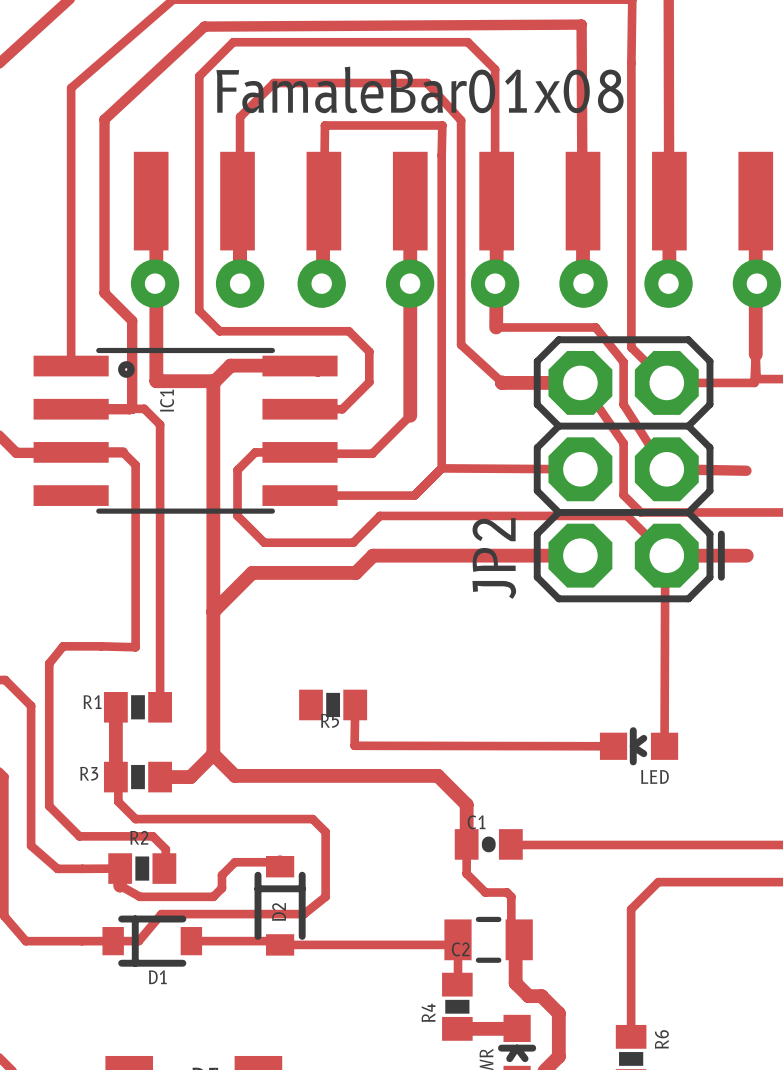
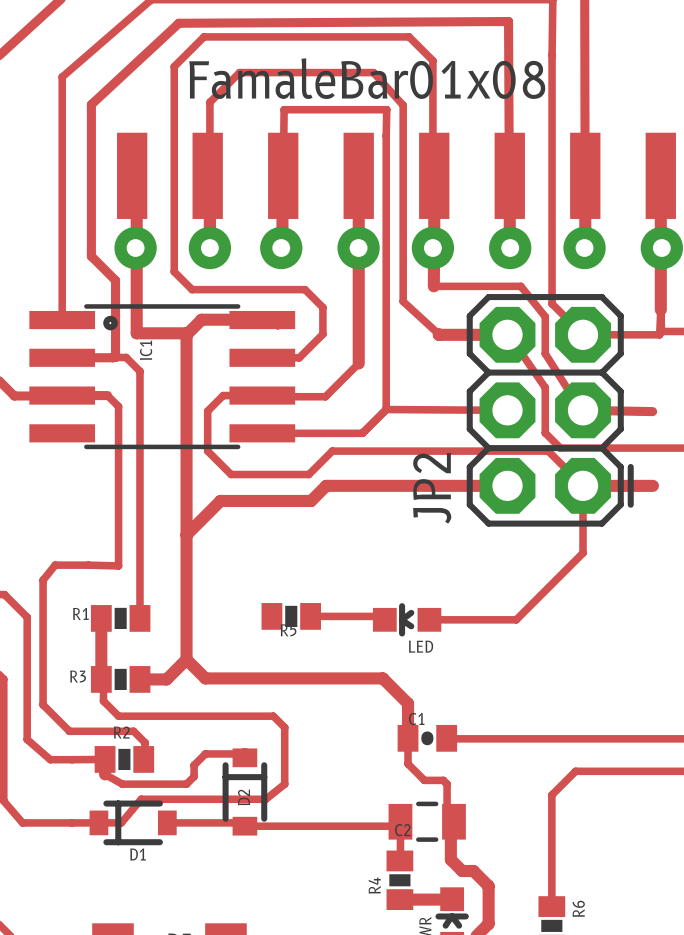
top track: (666, 555) (665, 555) (664, 746) -> (583, 485) (583, 553) (516, 619) (429, 619)
top track: (355, 704) (354, 745) (613, 746) -> (310, 616) (381, 616) (384, 619)
LED position: (639, 746) -> (407, 619)

